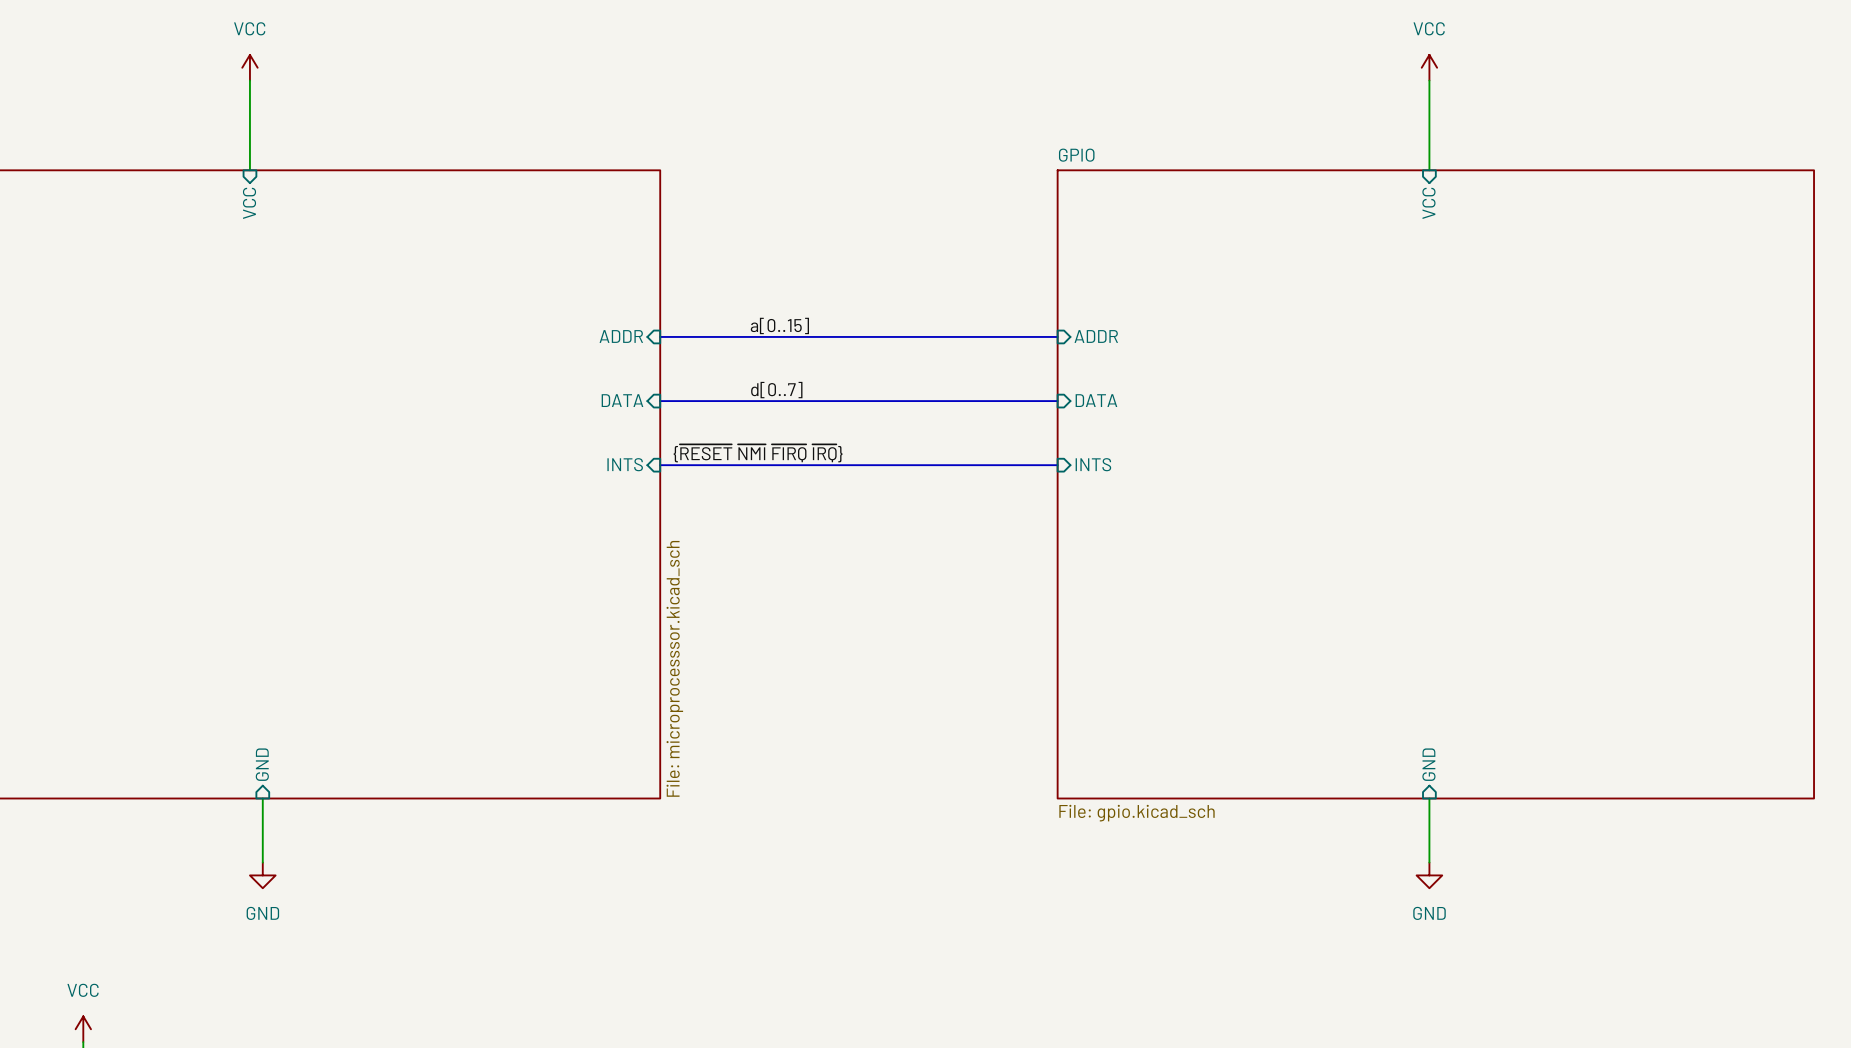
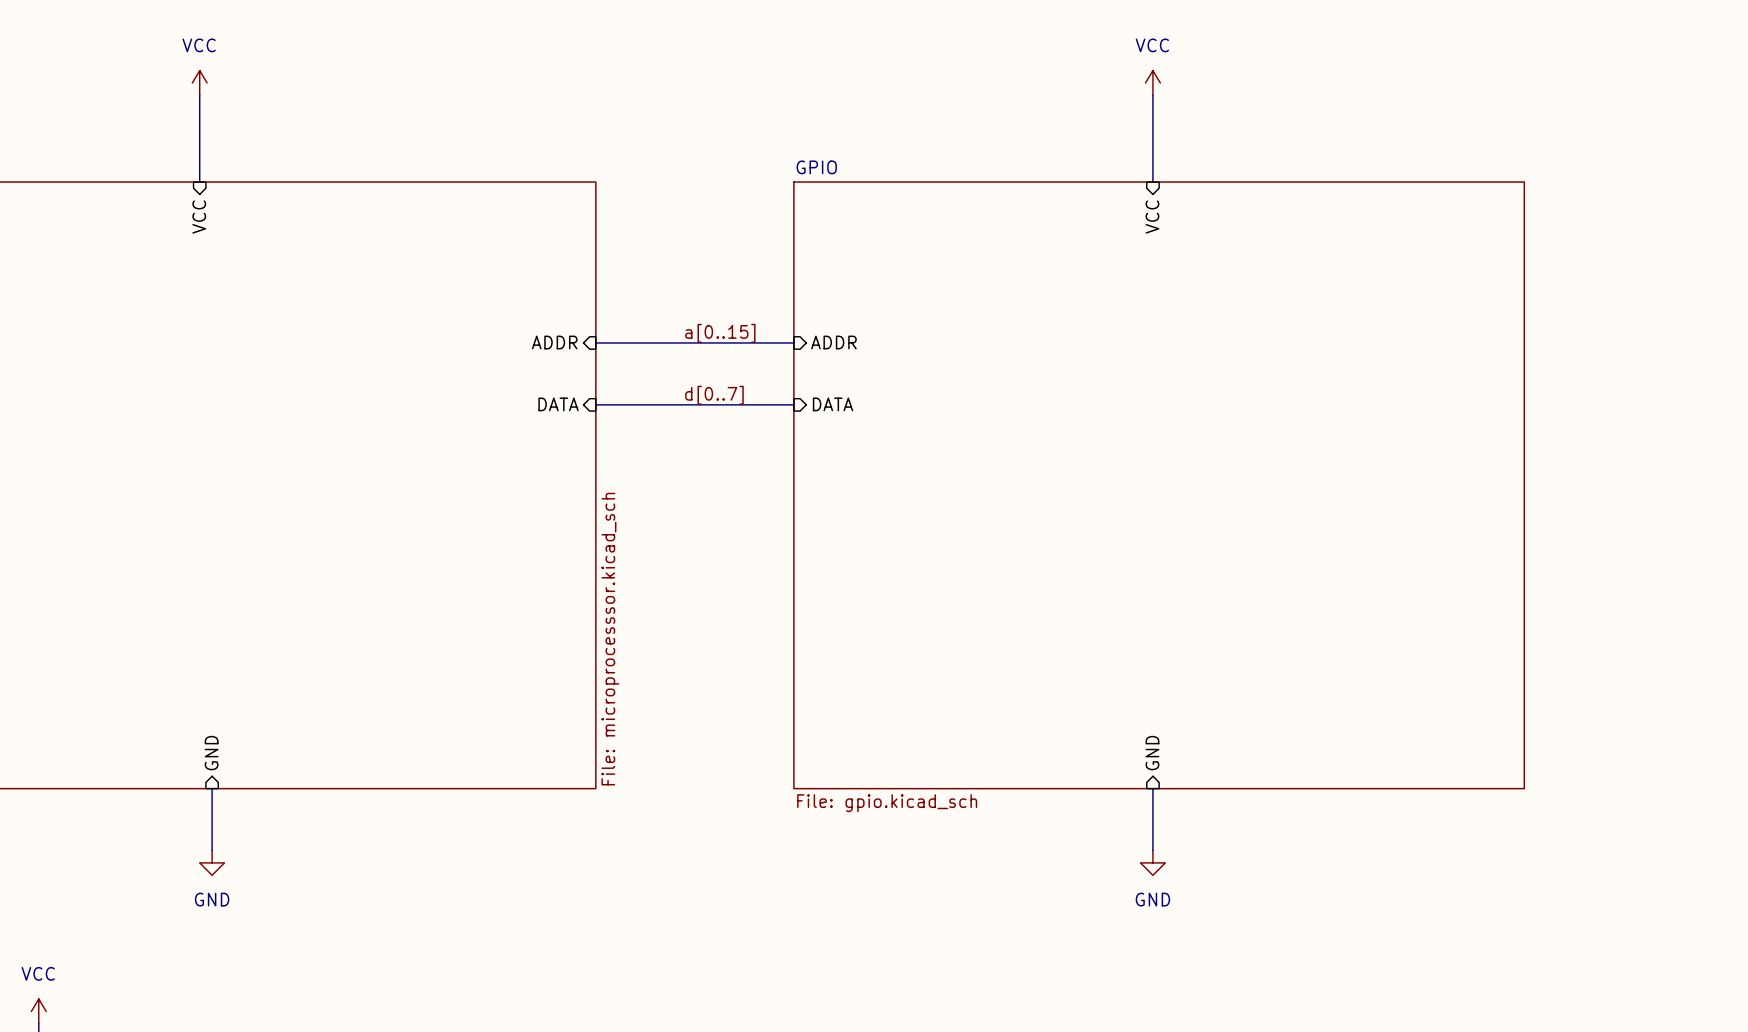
power symbol position: VCC (1429, 67) -> VCC (1152, 83)
wire: (1429, 80) (1429, 170) -> (1152, 95) (1152, 182)
sheet pin position: VCC (1428, 203) -> VCC (1152, 217)
bus: (865, 336) (1057, 336) -> none
sheet pin position: ADDR (1096, 336) -> ADDR (833, 342)
sheet pin position: DATA (1096, 400) -> DATA (833, 404)
bus: (865, 401) (1057, 401) -> none
label: {~{RESET} ~{NMI} ~{FIRQ} ~{IRQ}} (758, 453) -> none
sheet pin: INTS (625, 464) -> none
sheet pin: INTS (1093, 464) -> none
bus: (660, 465) (1057, 465) -> none
sheet GPIO position: (1435, 484) -> (1159, 485)
sheet pin position: GND (1428, 764) -> GND (1152, 753)
wire: (1429, 798) (1429, 862) -> (1152, 788) (1152, 850)
power symbol position: GND (1429, 875) -> GND (1152, 862)

